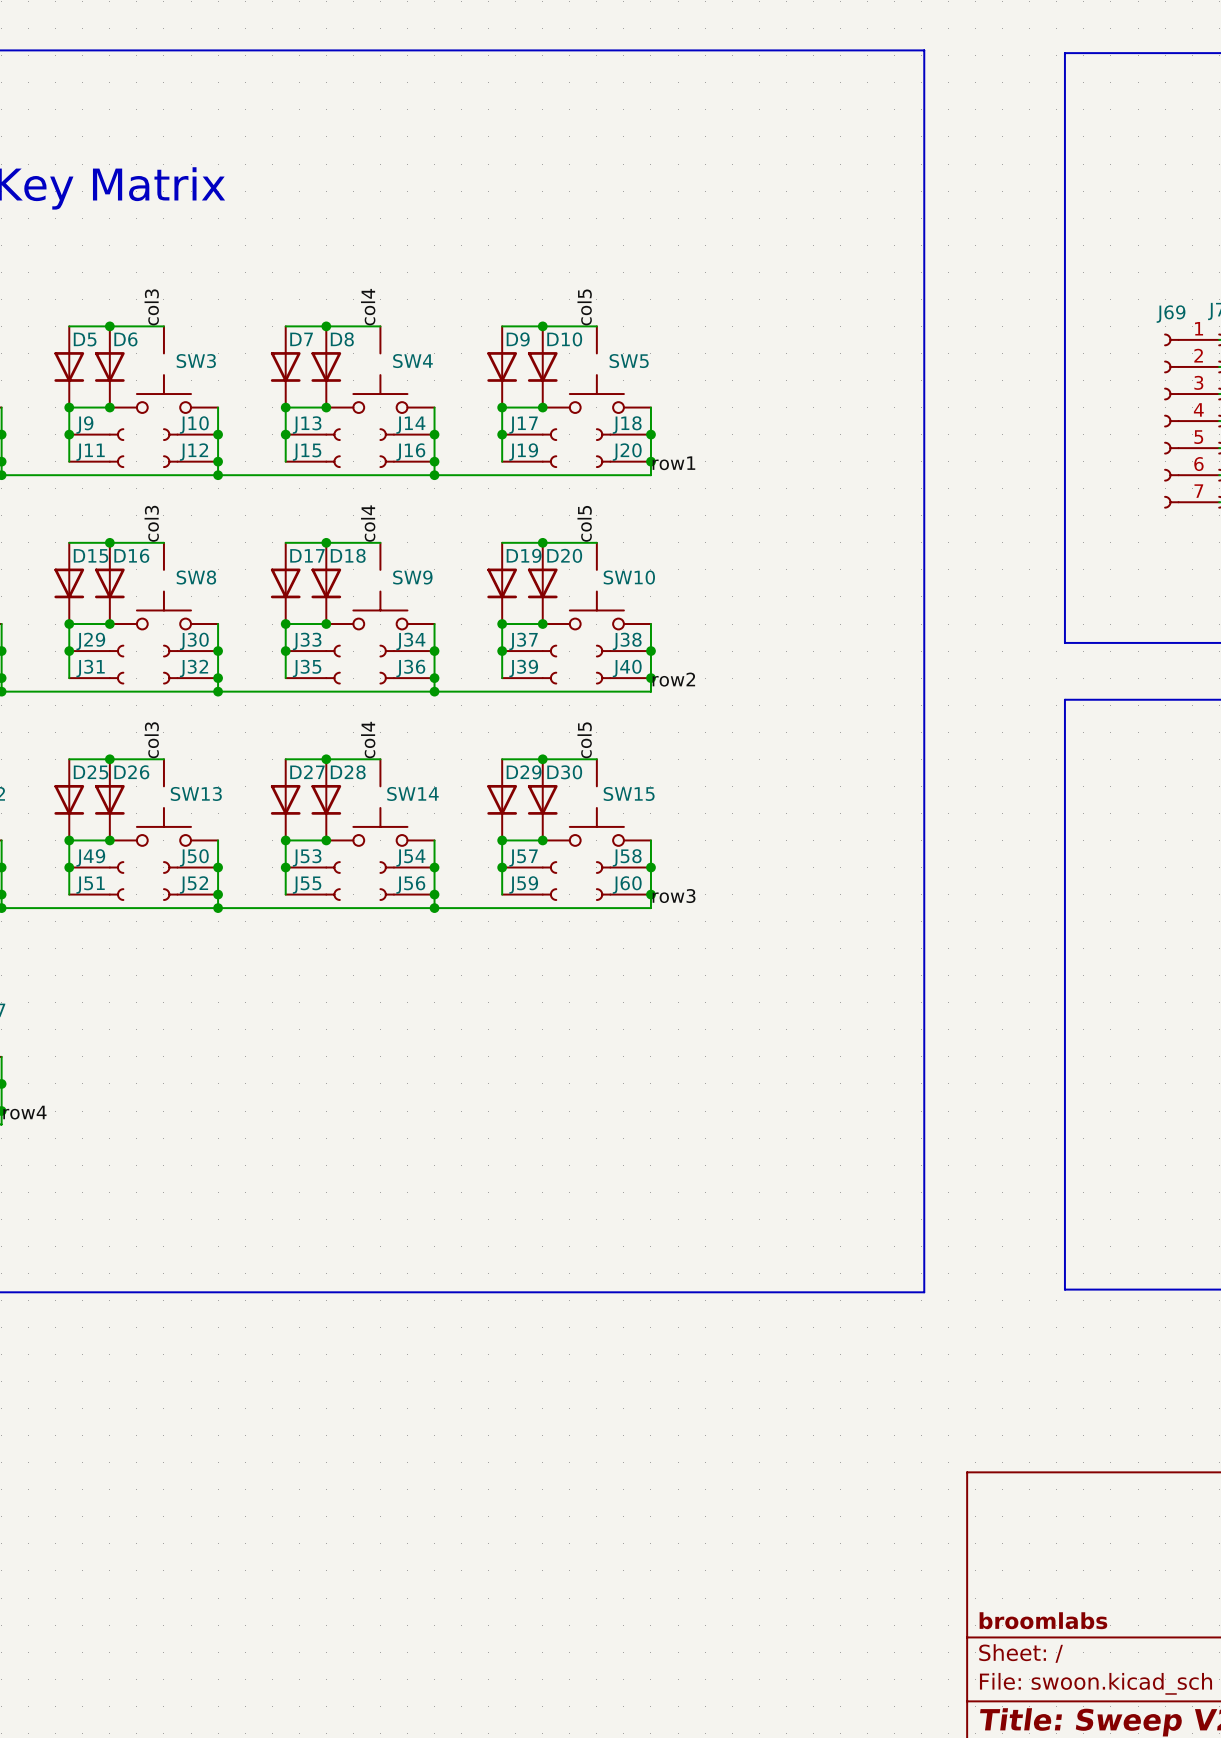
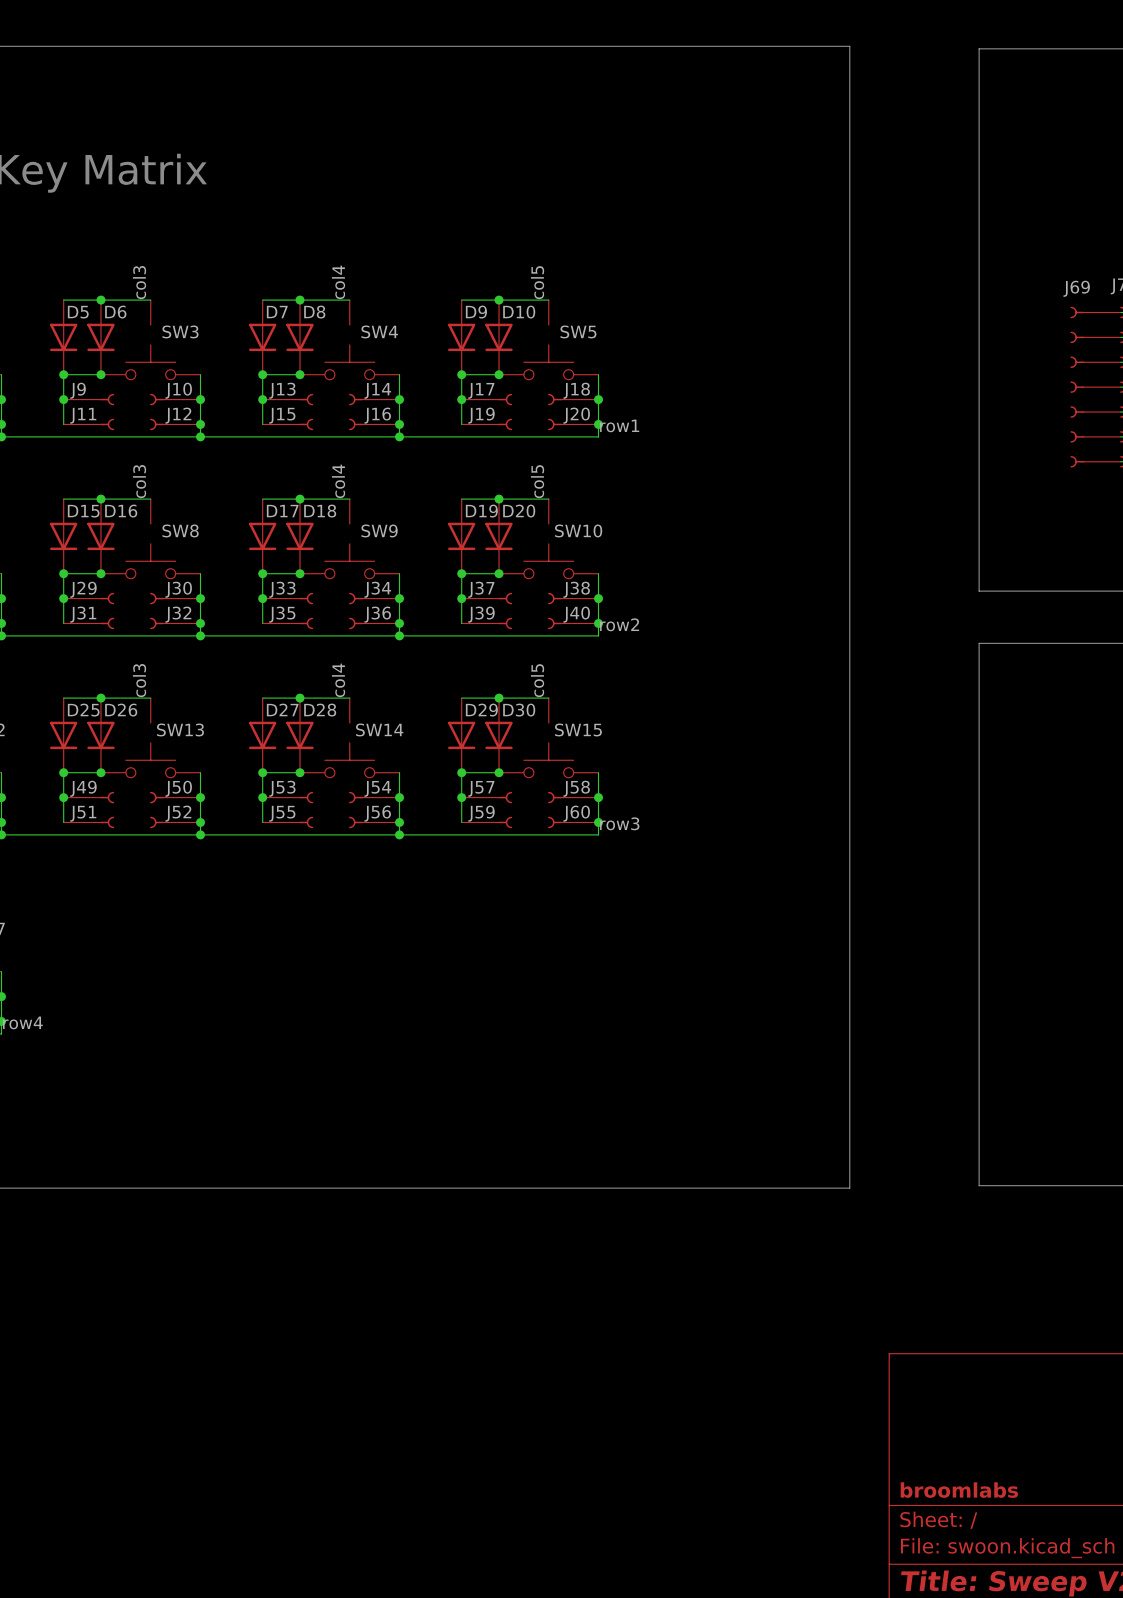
J69 pin number: 1 (1199, 328) -> none
J69 pin number: 2 (1198, 355) -> none
J69 pin number: 3 (1198, 382) -> none
J69 pin number: 4 (1198, 409) -> none
J69 pin number: 5 (1198, 437) -> none
J69 pin number: 6 (1198, 464) -> none
J69 pin number: 7 (1198, 491) -> none

